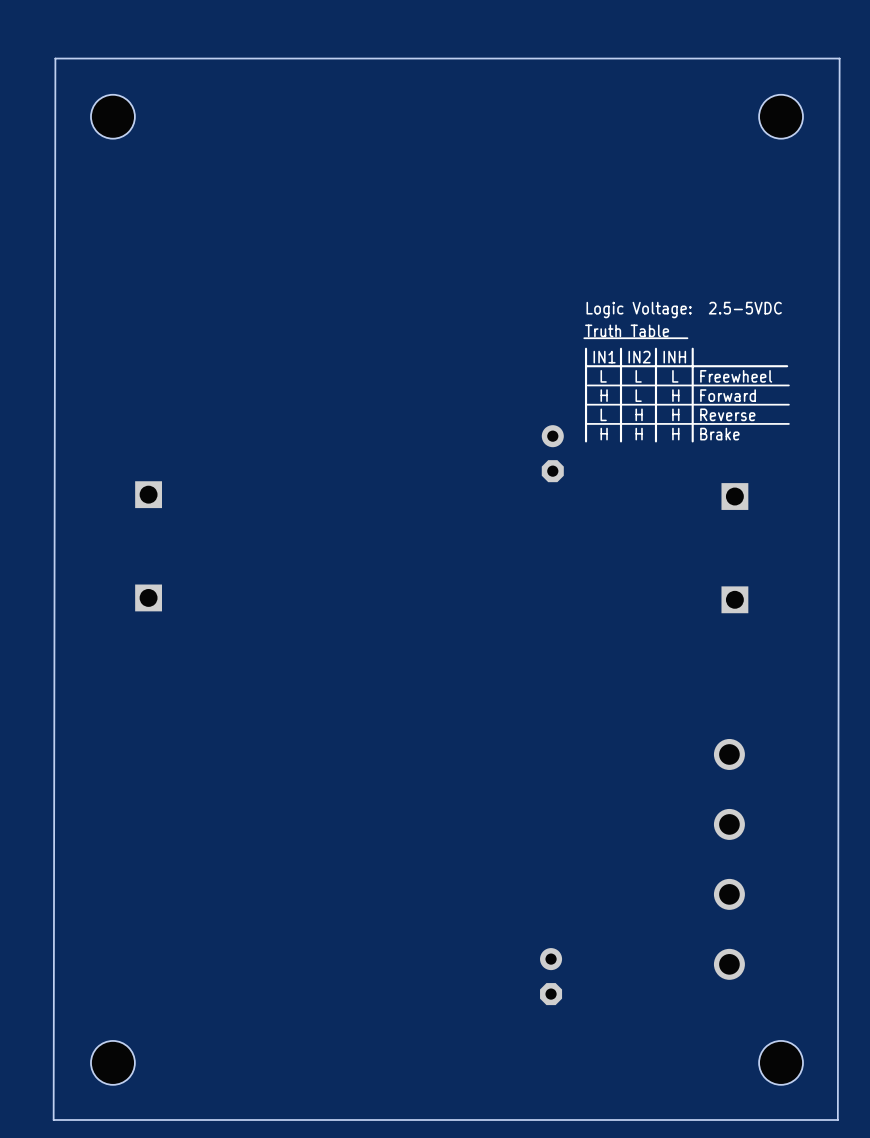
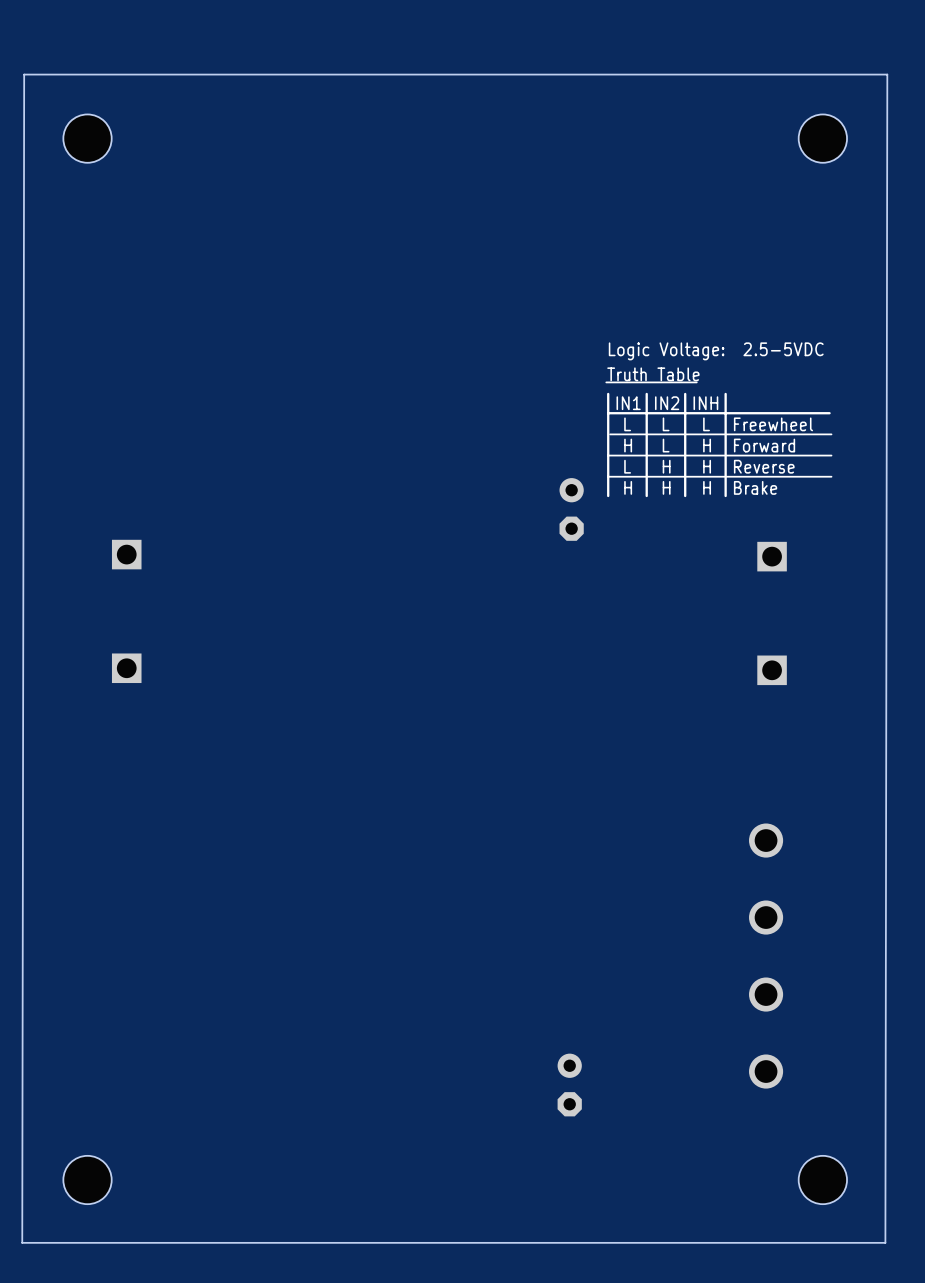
line: (687, 338) (666, 338) -> none

